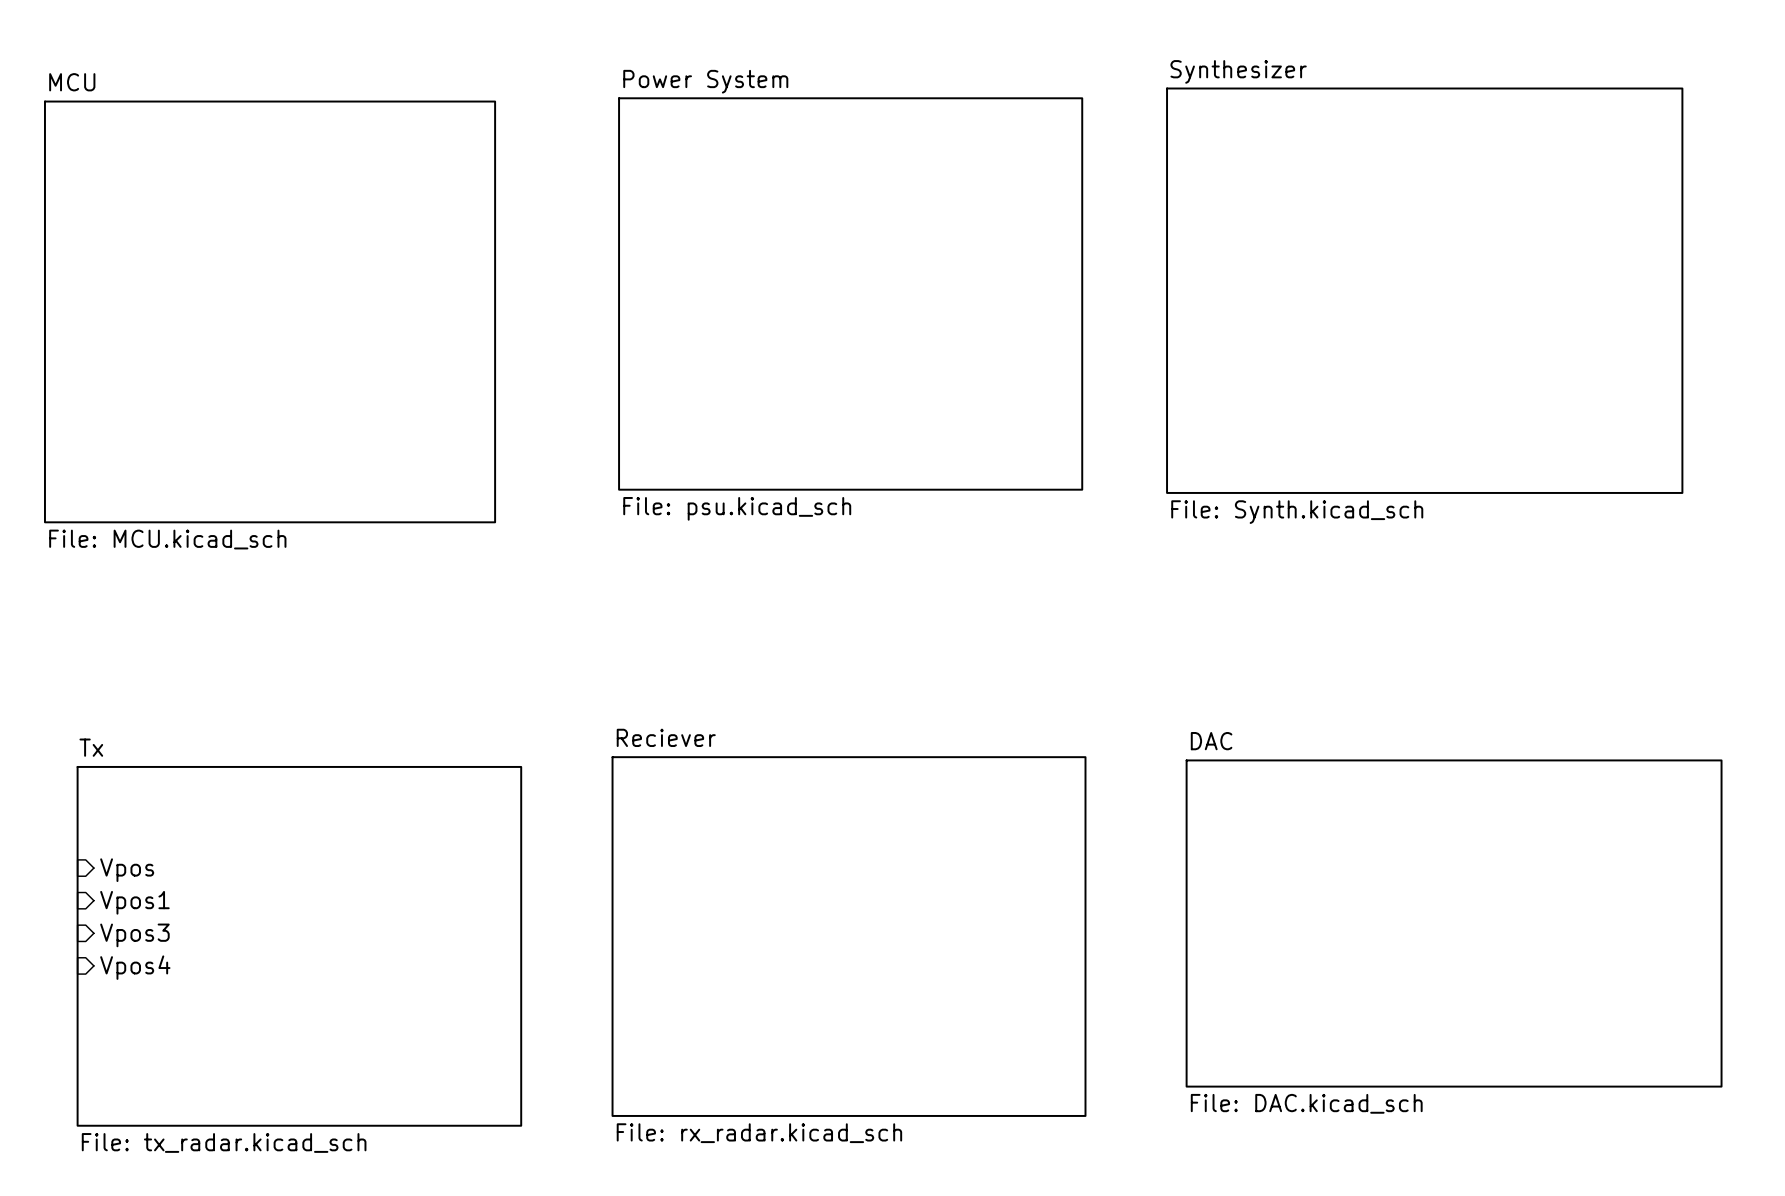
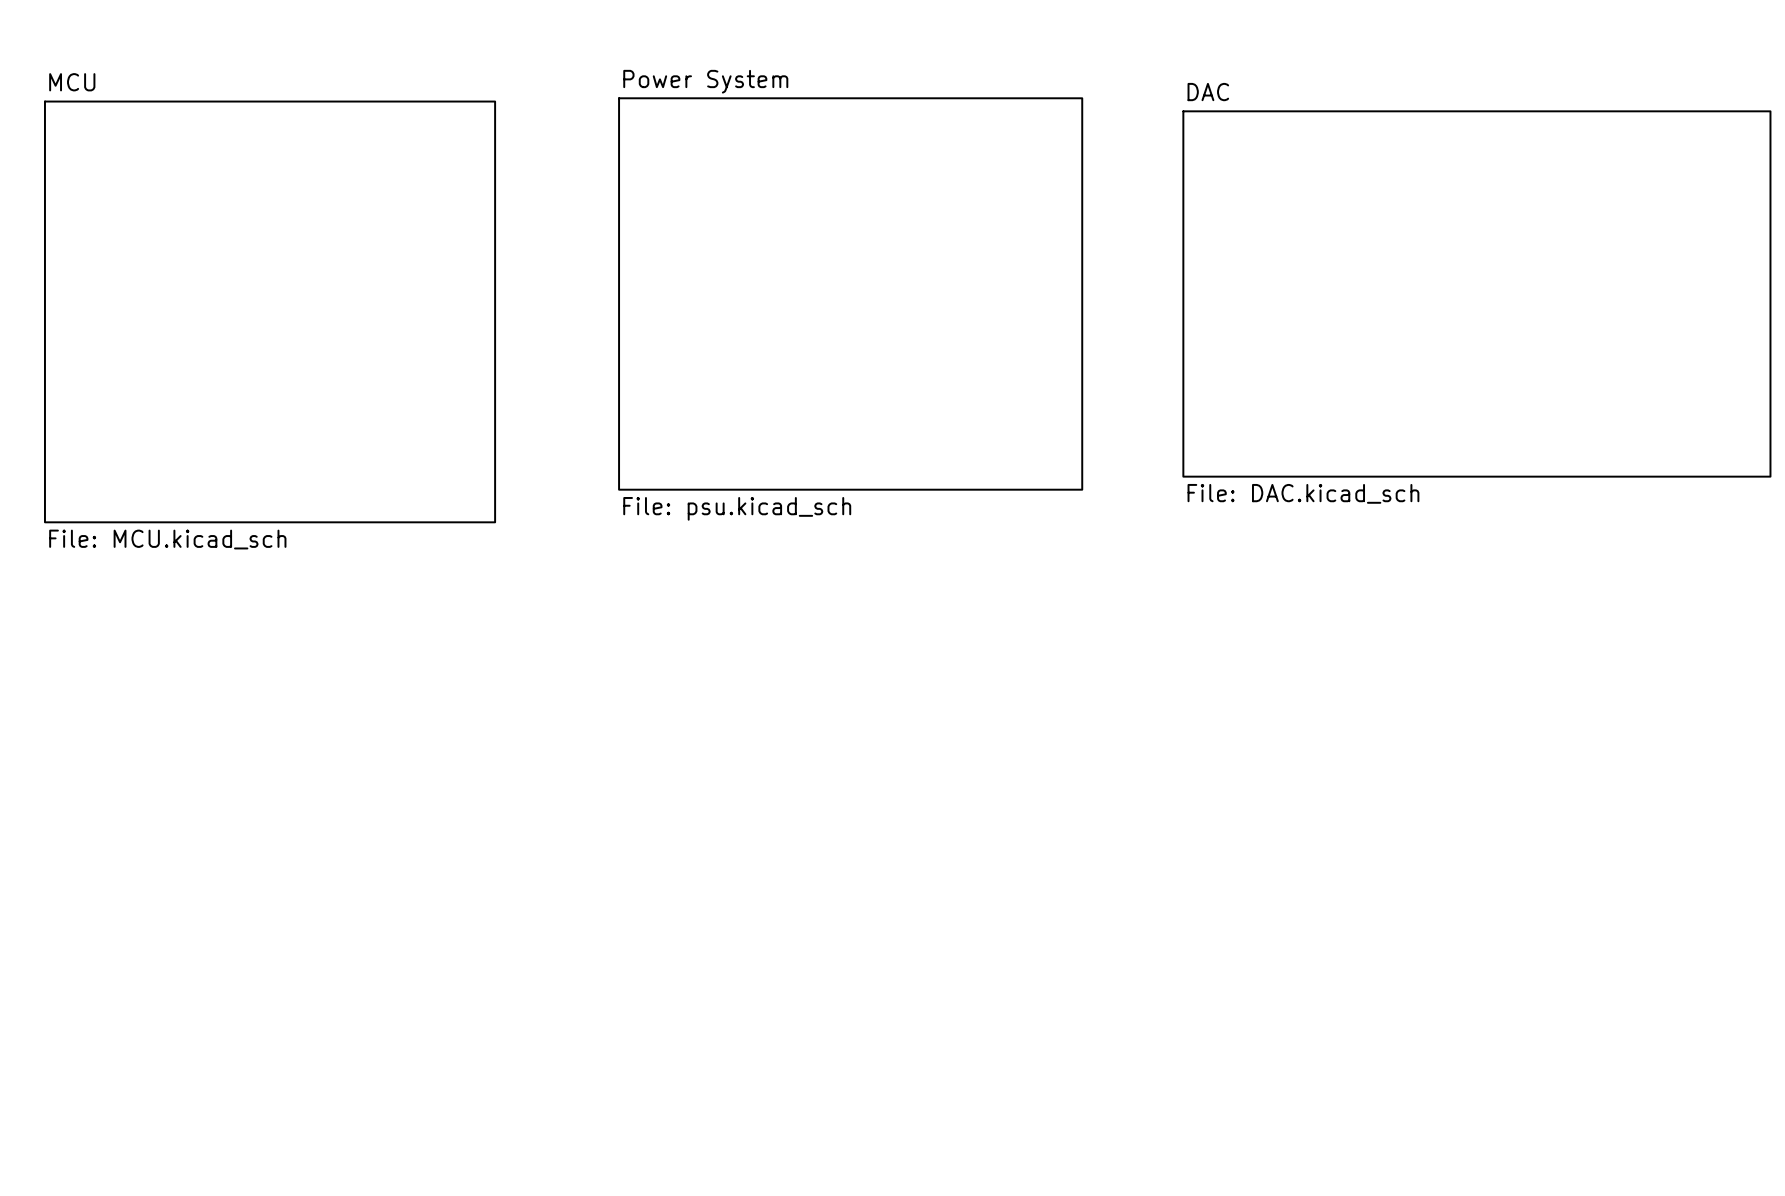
sheet Synthesizer: File: Synth.kicad_sch (1424, 290) -> none
sheet DAC: none -> File: DAC.kicad_sch (1476, 293)
sheet pin: Vpos (127, 870) -> none
sheet pin: Vpos1 (134, 902) -> none
sheet DAC: File: DAC.kicad_sch (1454, 923) -> none
sheet pin: Vpos3 (134, 935) -> none
sheet Reciever: File: rx_radar.kicad_sch (849, 936) -> none
sheet Tx: File: tx_radar.kicad_sch (299, 946) -> none
sheet pin: Vpos4 (135, 967) -> none

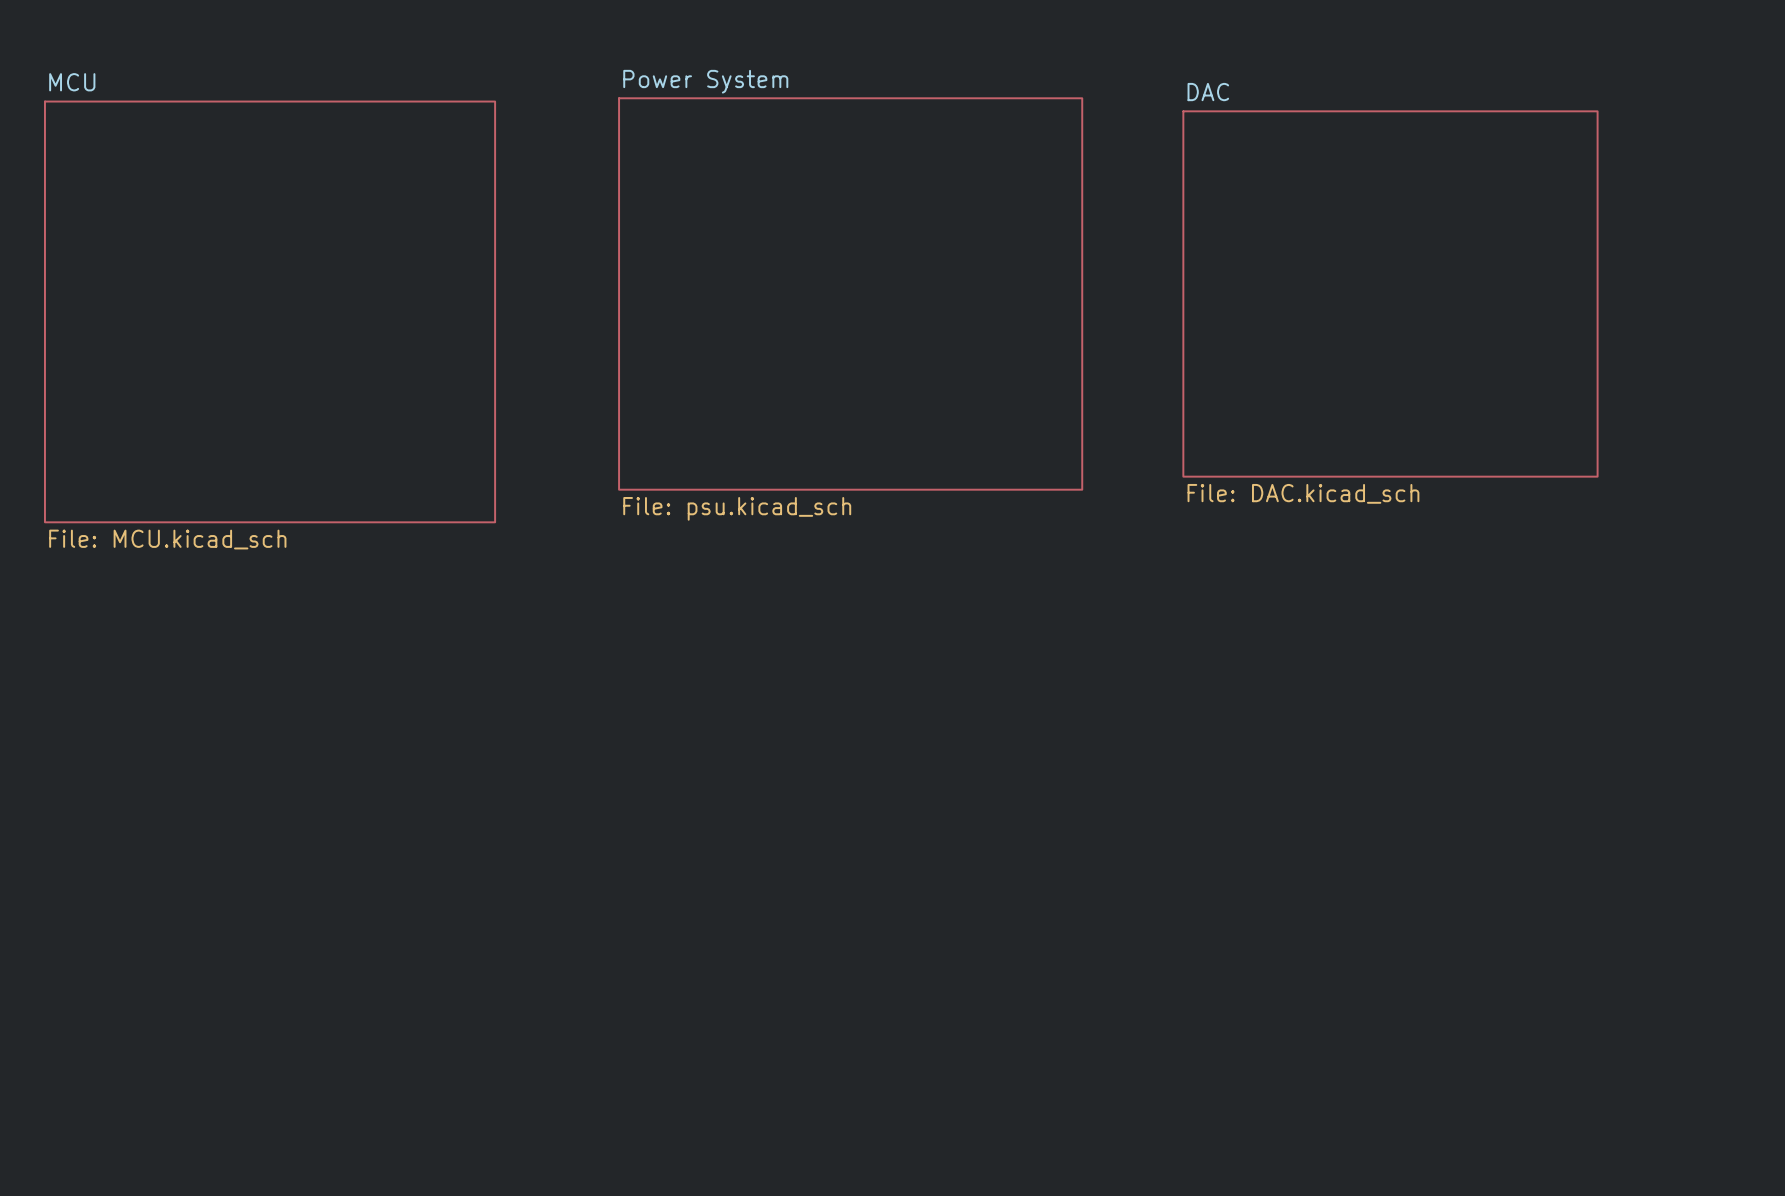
sheet DAC: none -> File: DAC.kicad_sch (1390, 293)
sheet DAC: File: DAC.kicad_sch (1476, 293) -> none

